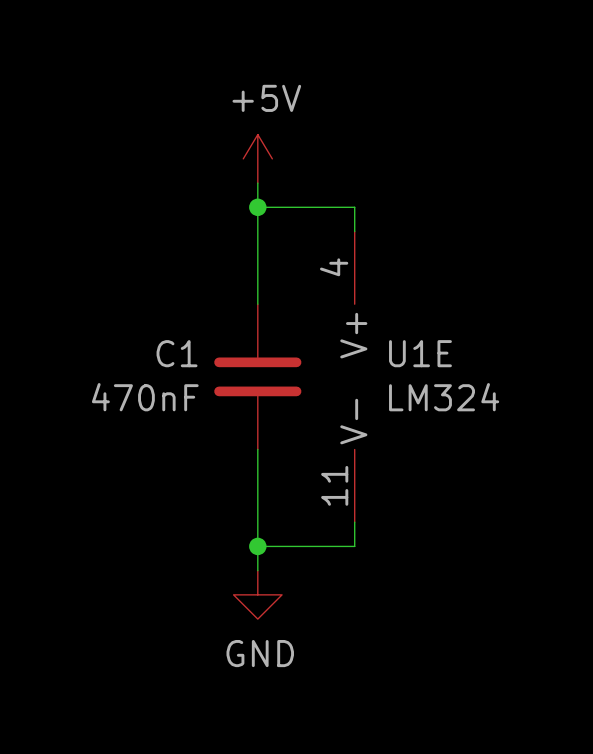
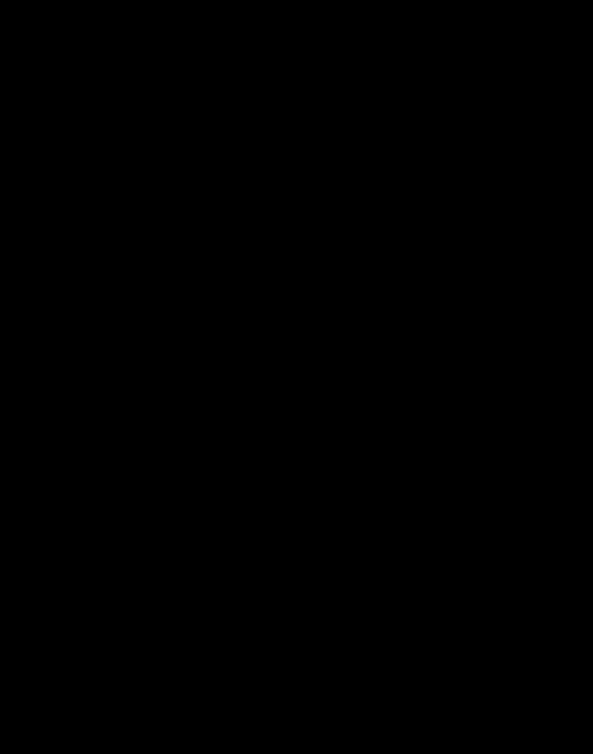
power symbol: +5V (257, 158) -> none
wire: (257, 183) (257, 304) -> none
wire: (257, 207) (354, 207) (354, 231) -> none
junction: (257, 207) -> none
C1: 470nF (257, 376) -> none
U1E: LM324 (354, 376) -> none
wire: (257, 449) (257, 570) -> none
wire: (354, 522) (354, 546) (257, 546) -> none
junction: (257, 546) -> none
power symbol: GND (257, 594) -> none

